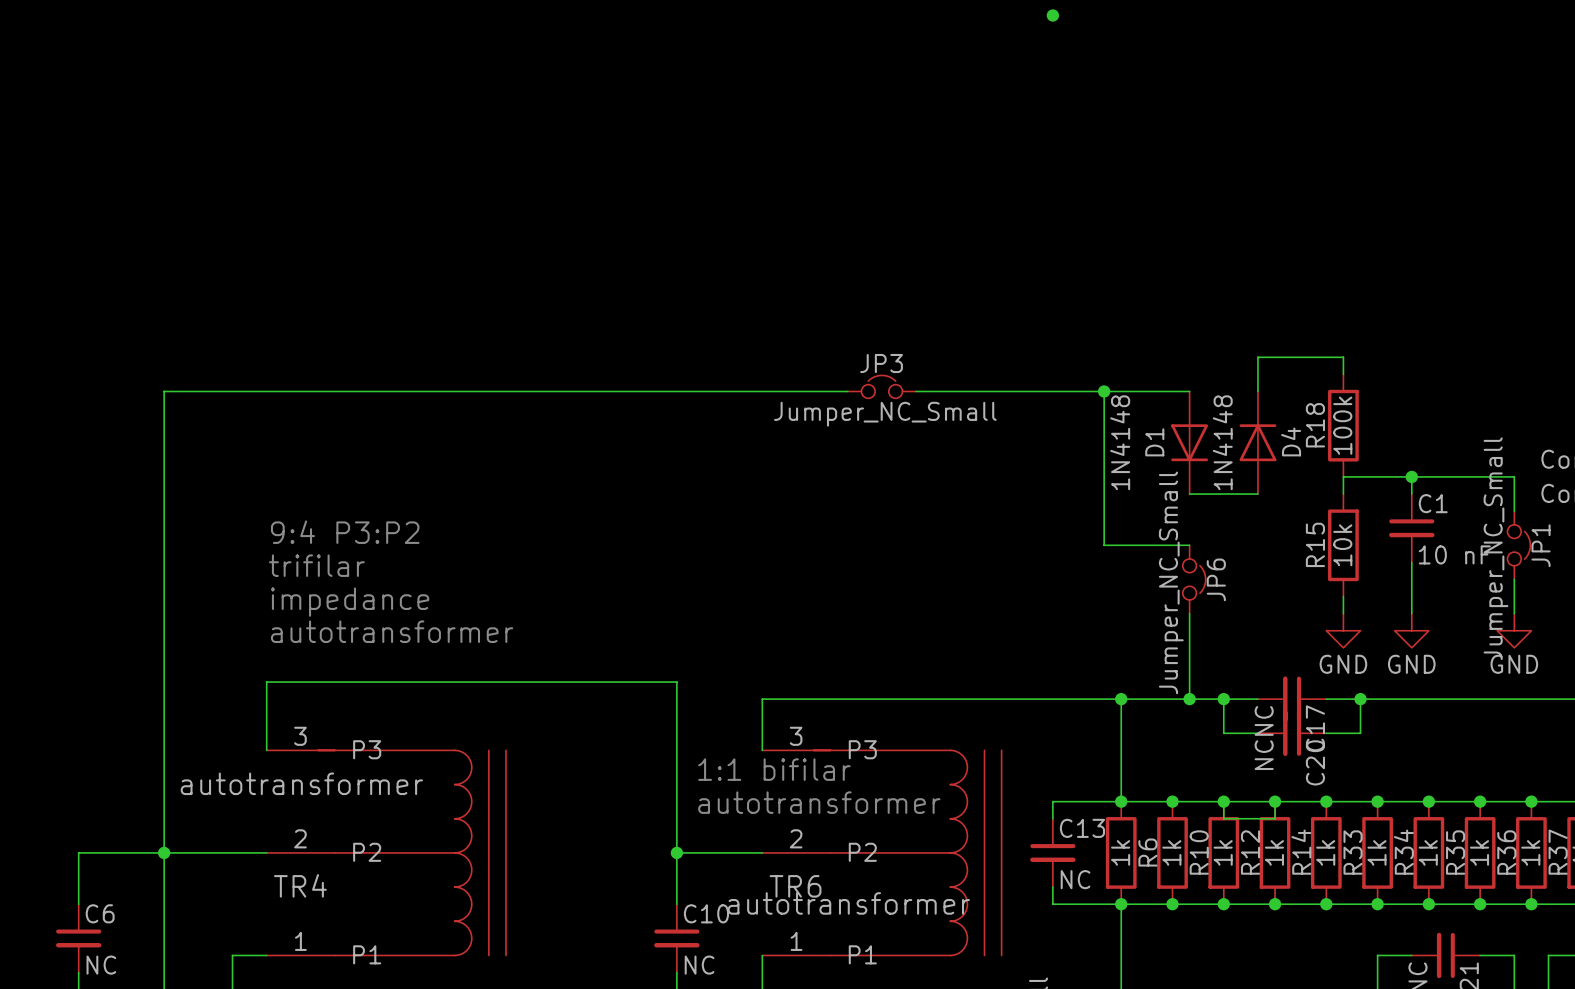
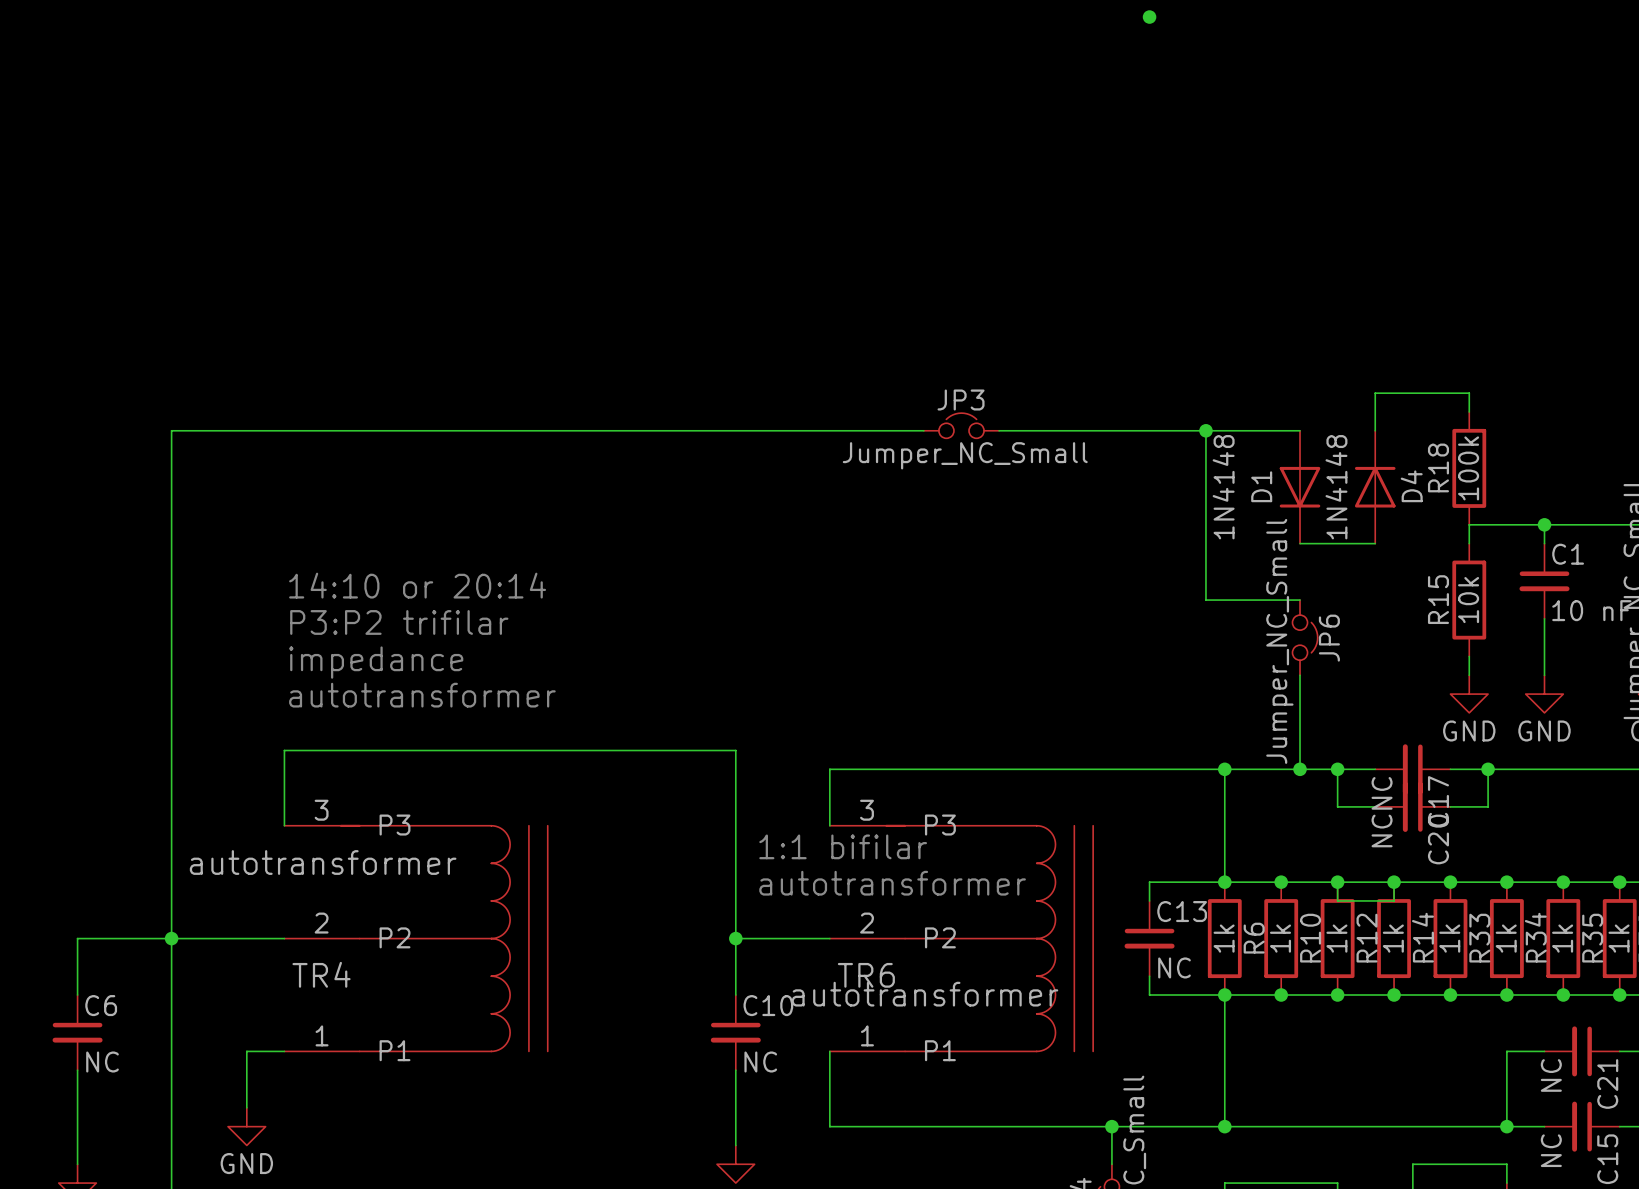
text: 9:4 P3:P2 (345, 532) -> 14:10 or 20:14 (417, 585)
text: trifilar (316, 565) -> P3:P2 trifilar (399, 622)

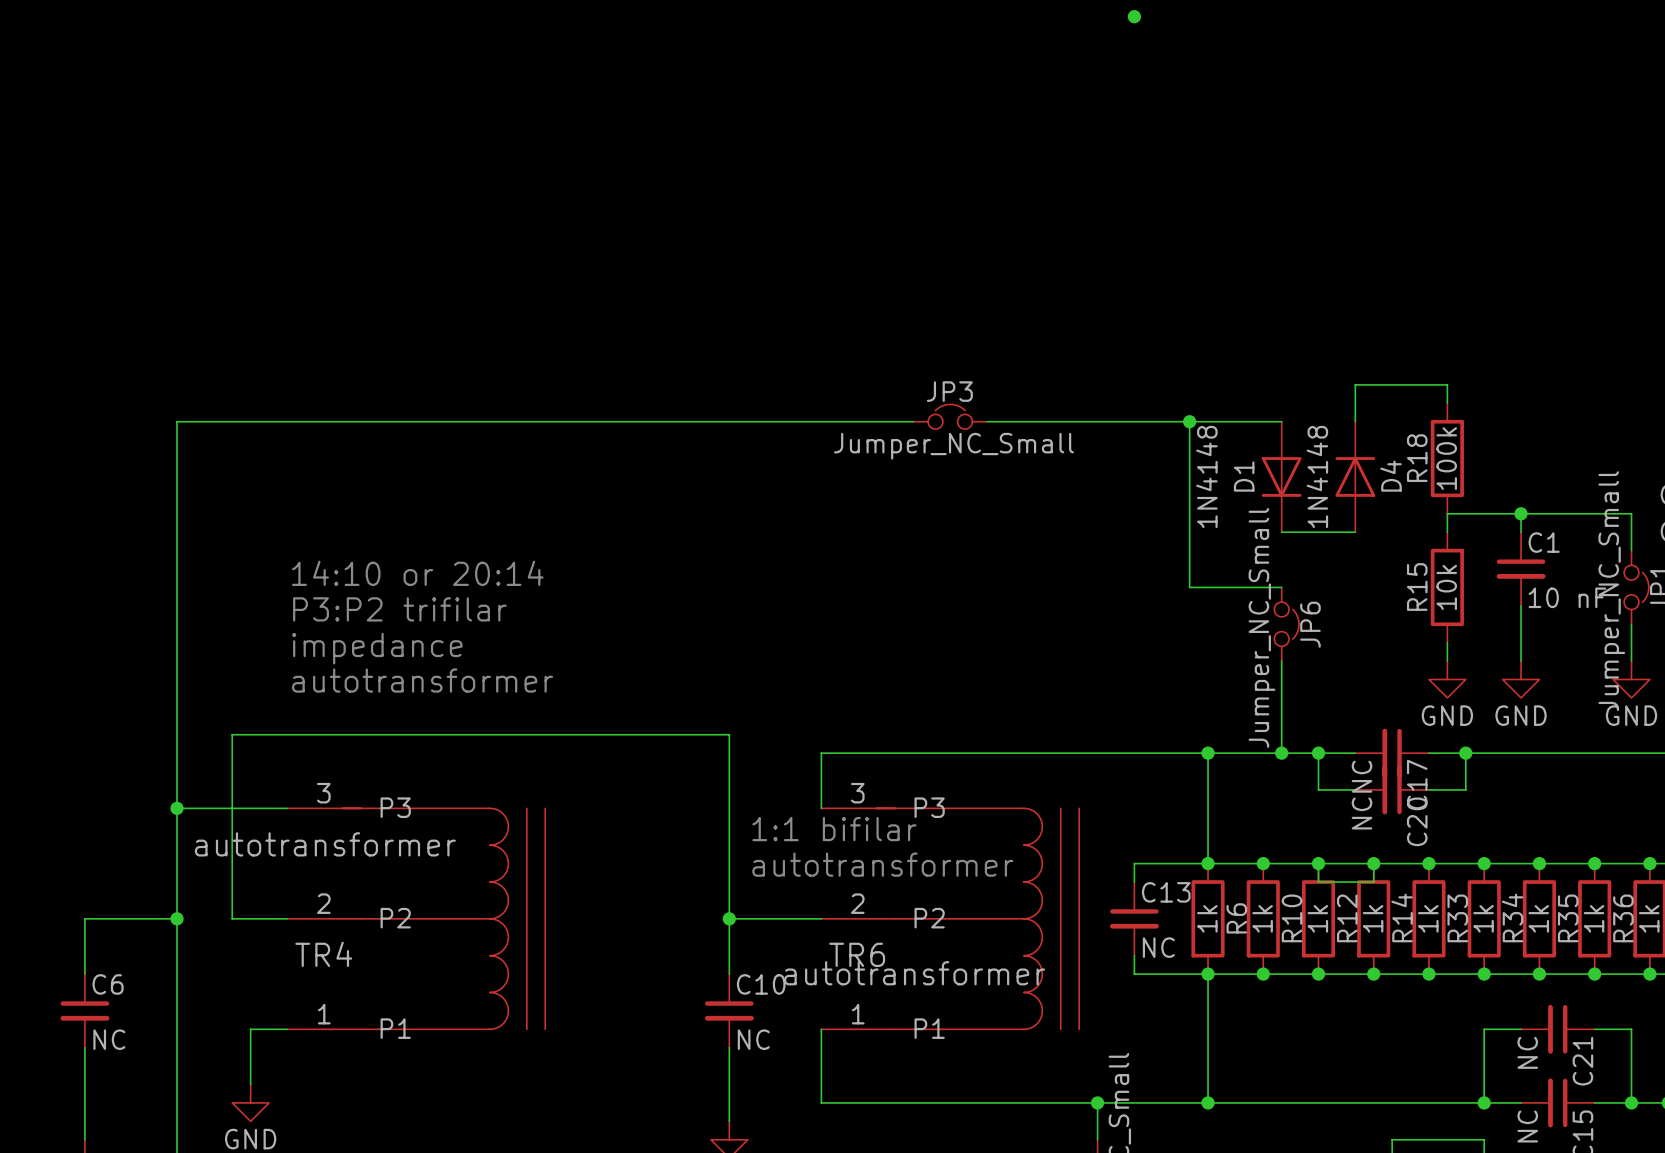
wire: (284, 750) (284, 825) -> (287, 734) (232, 734) (232, 918)
wire: none -> (177, 808) (287, 808)
junction: none -> (177, 808)
wire: (171, 938) (228, 938) -> none

